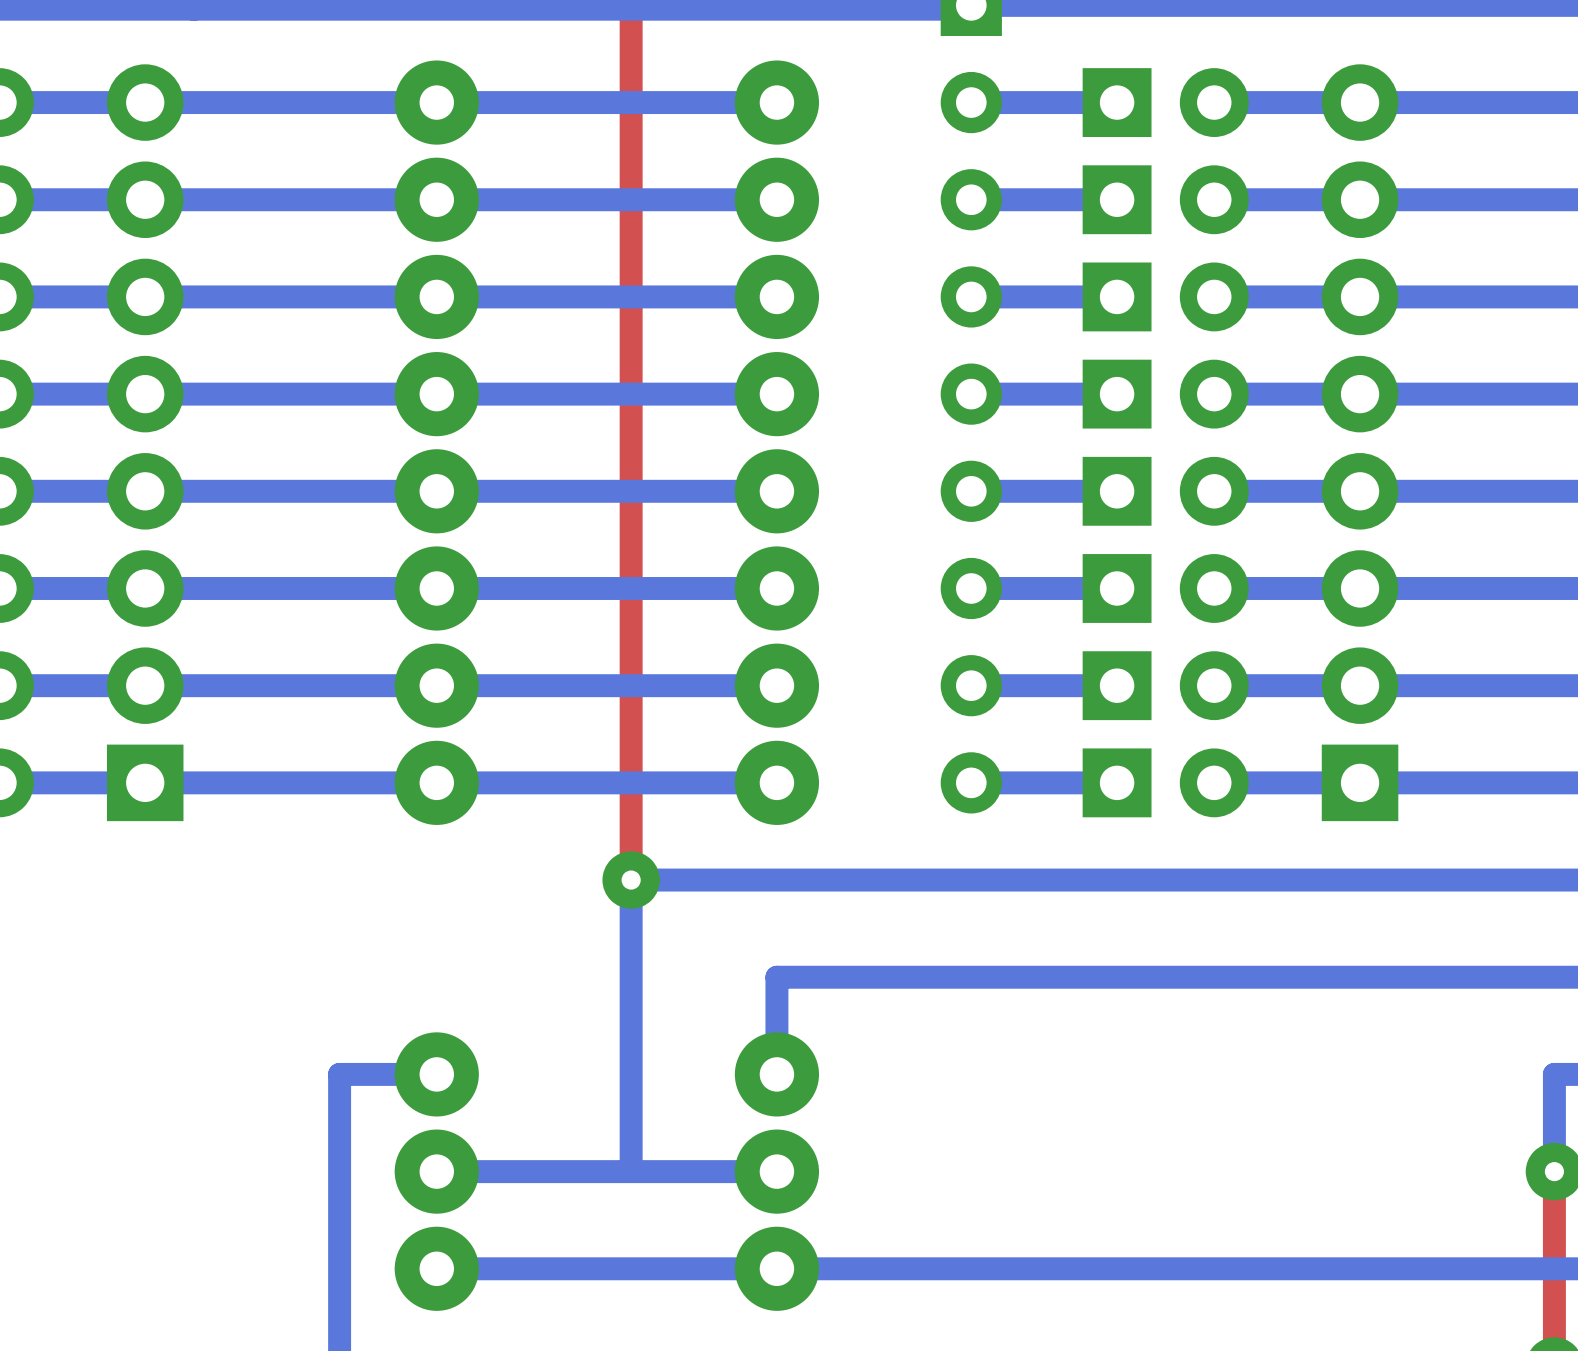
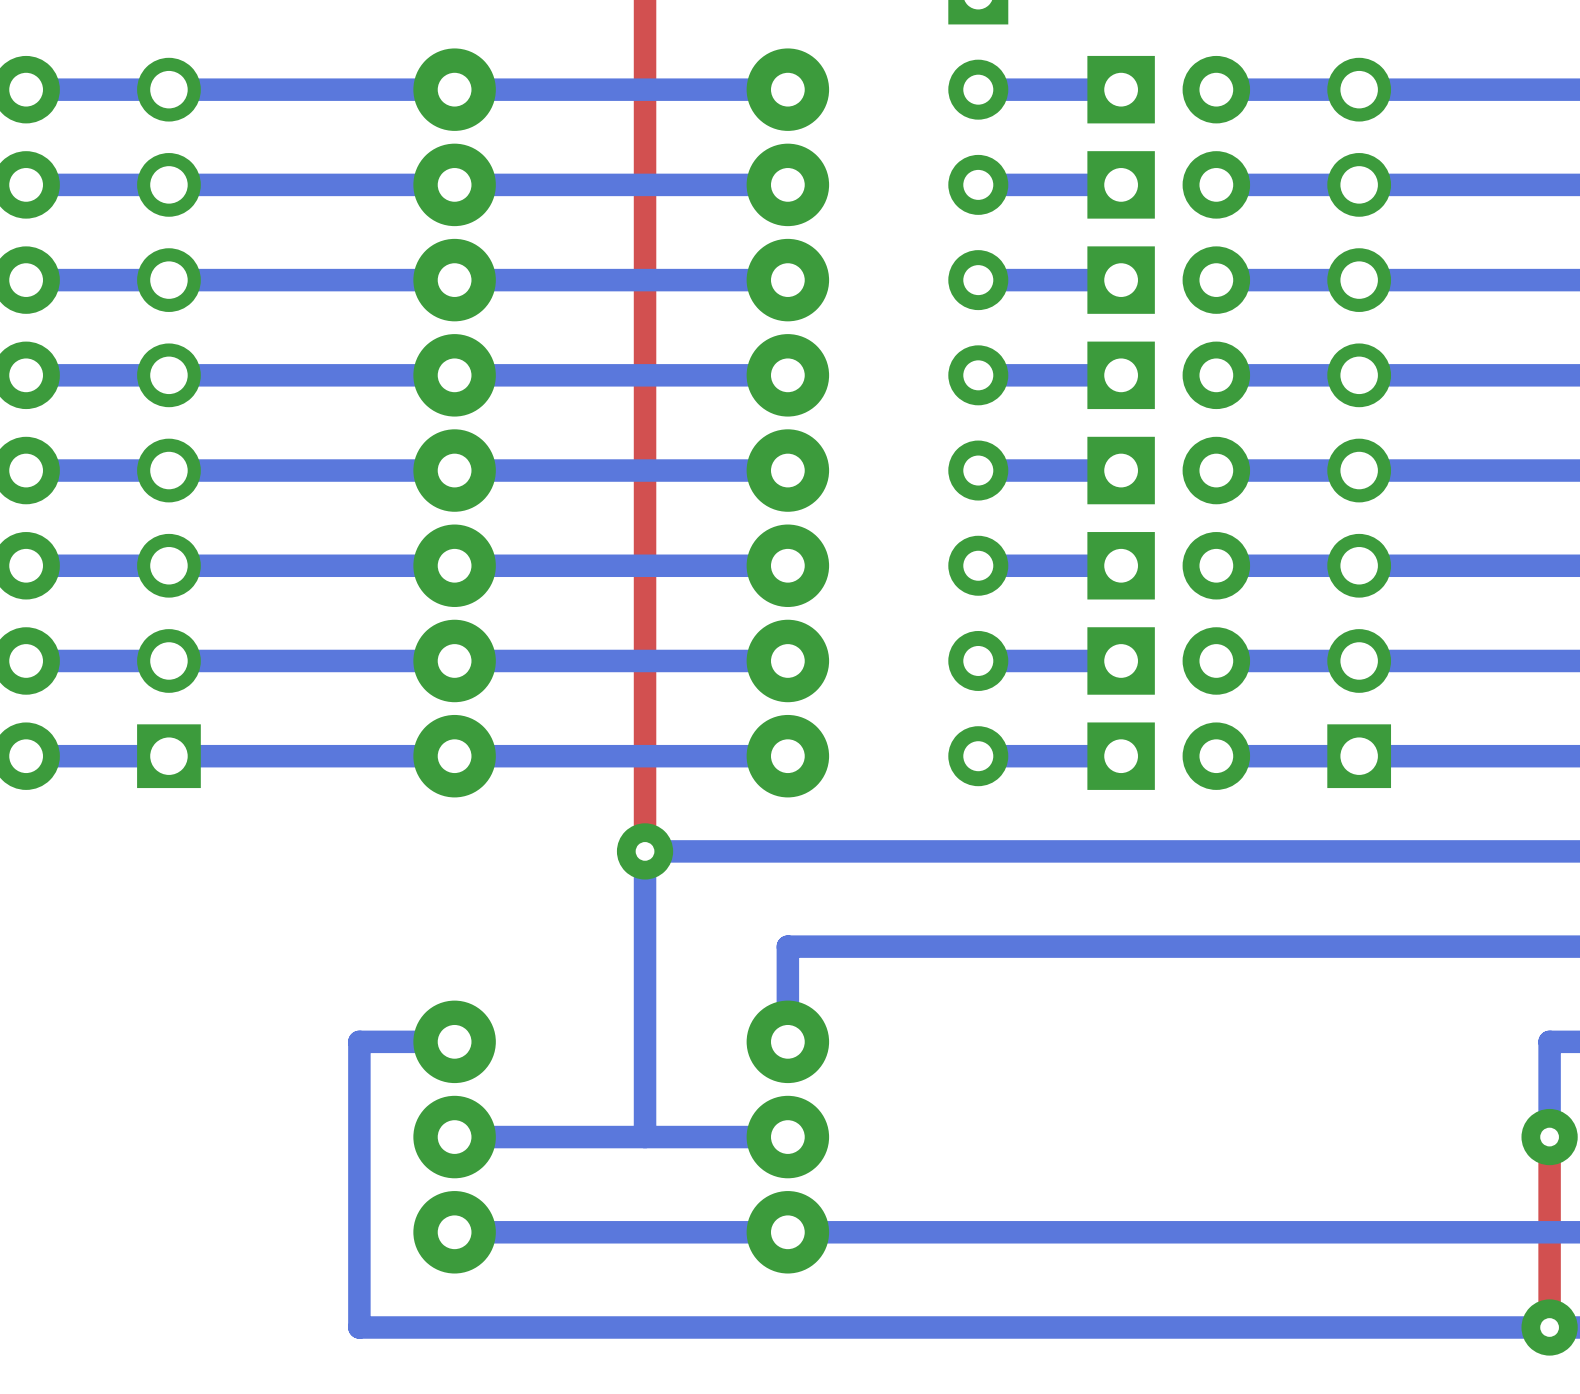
part footprint: [106, 64, 184, 822] -> [137, 57, 201, 789]
part footprint: [1321, 64, 1399, 822] -> [1327, 57, 1392, 789]

